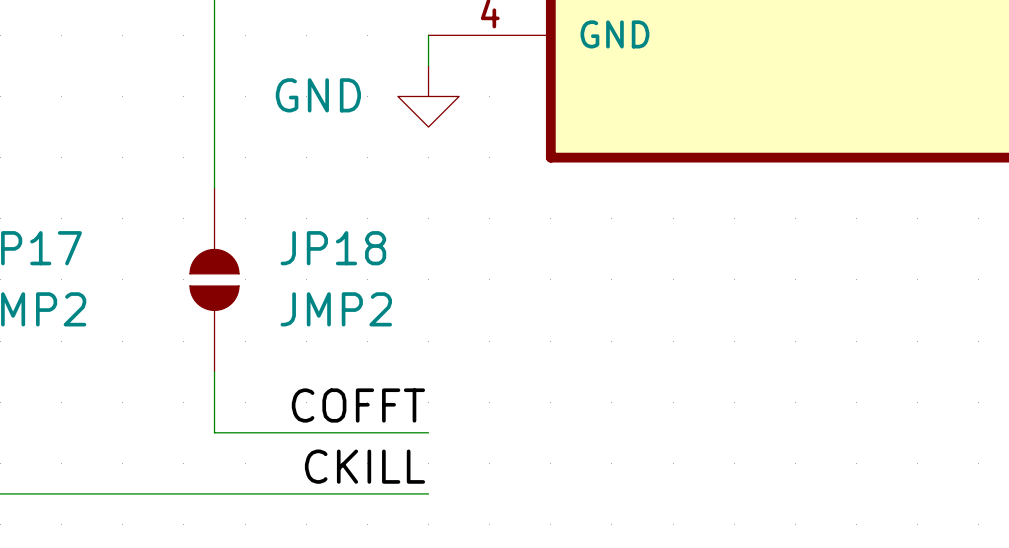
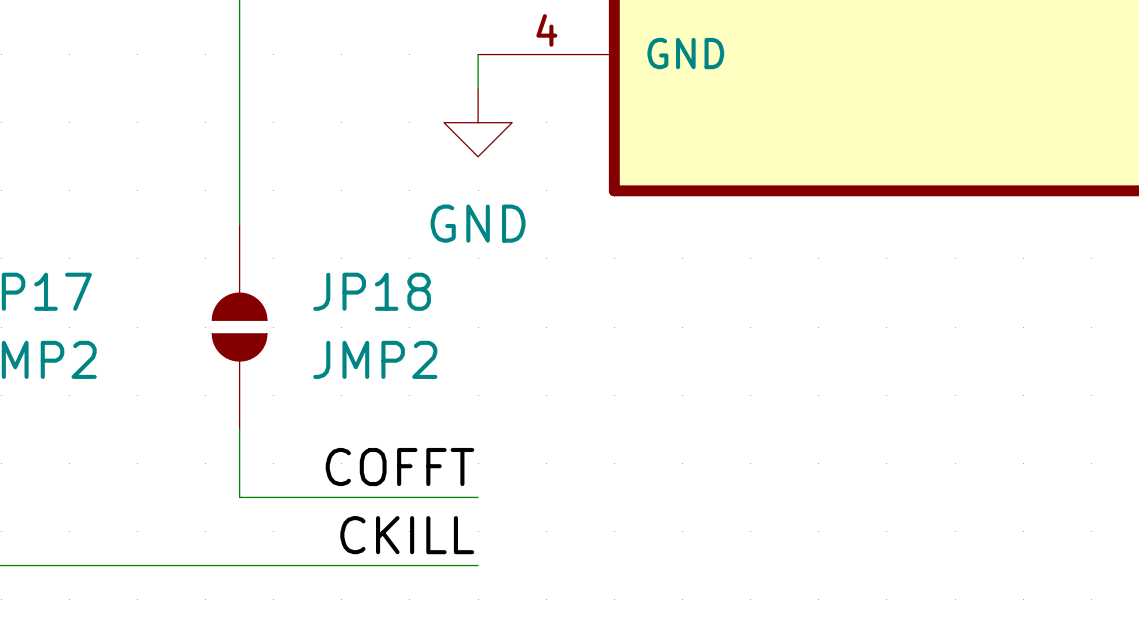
power symbol text position: GND (318, 95) -> GND (478, 223)

